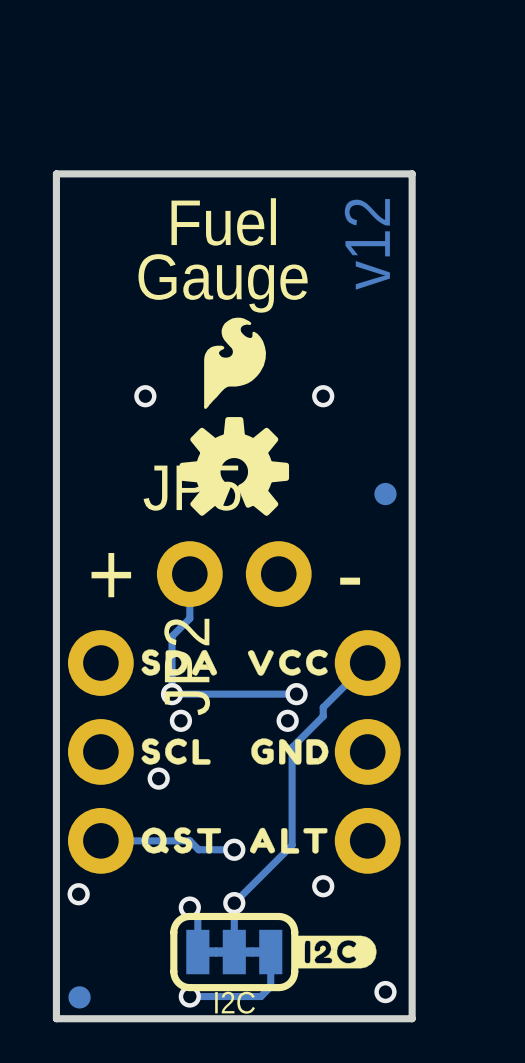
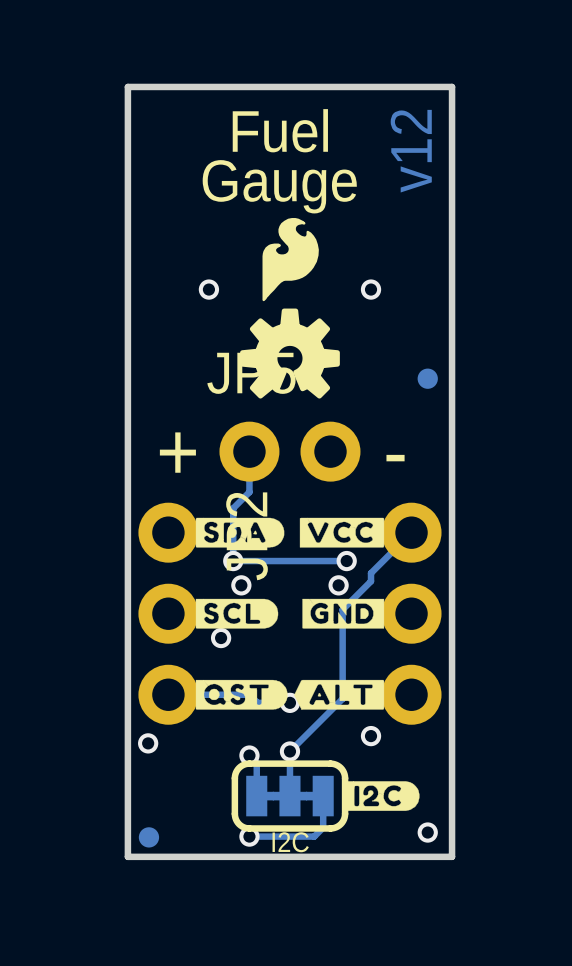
drawing shape: [141, 649, 218, 676] -> [195, 517, 285, 548]
drawing shape: [247, 649, 328, 676] -> [299, 517, 385, 548]
drawing shape: [141, 738, 211, 765] -> [195, 598, 279, 629]
drawing shape: [251, 738, 329, 765] -> [302, 598, 385, 629]
drawing shape: [141, 827, 221, 854] -> [195, 679, 288, 710]
drawing shape: [249, 827, 328, 854] -> [294, 679, 385, 710]

